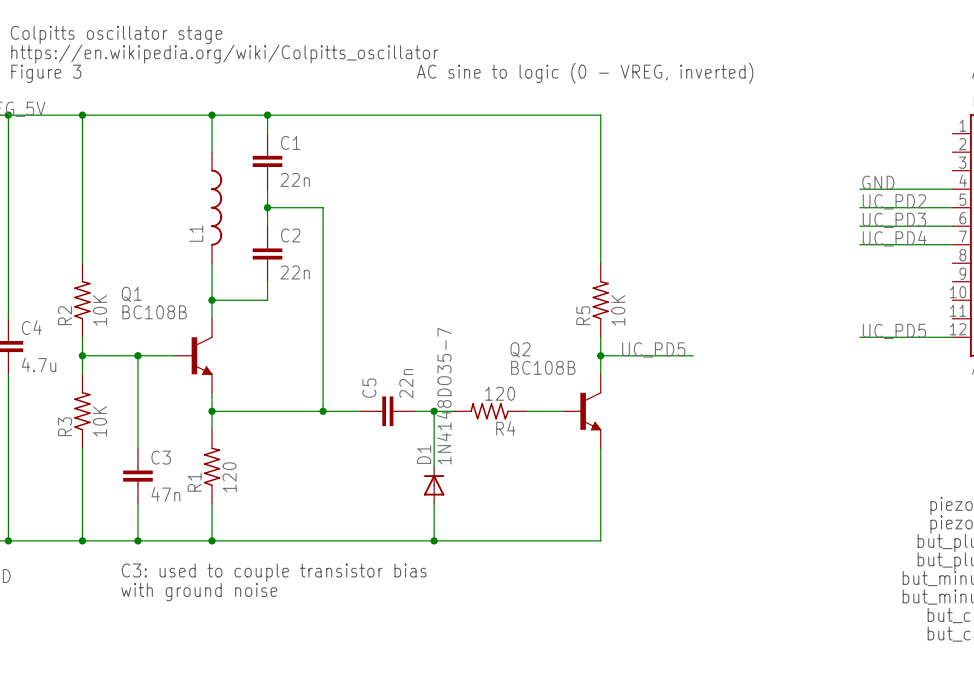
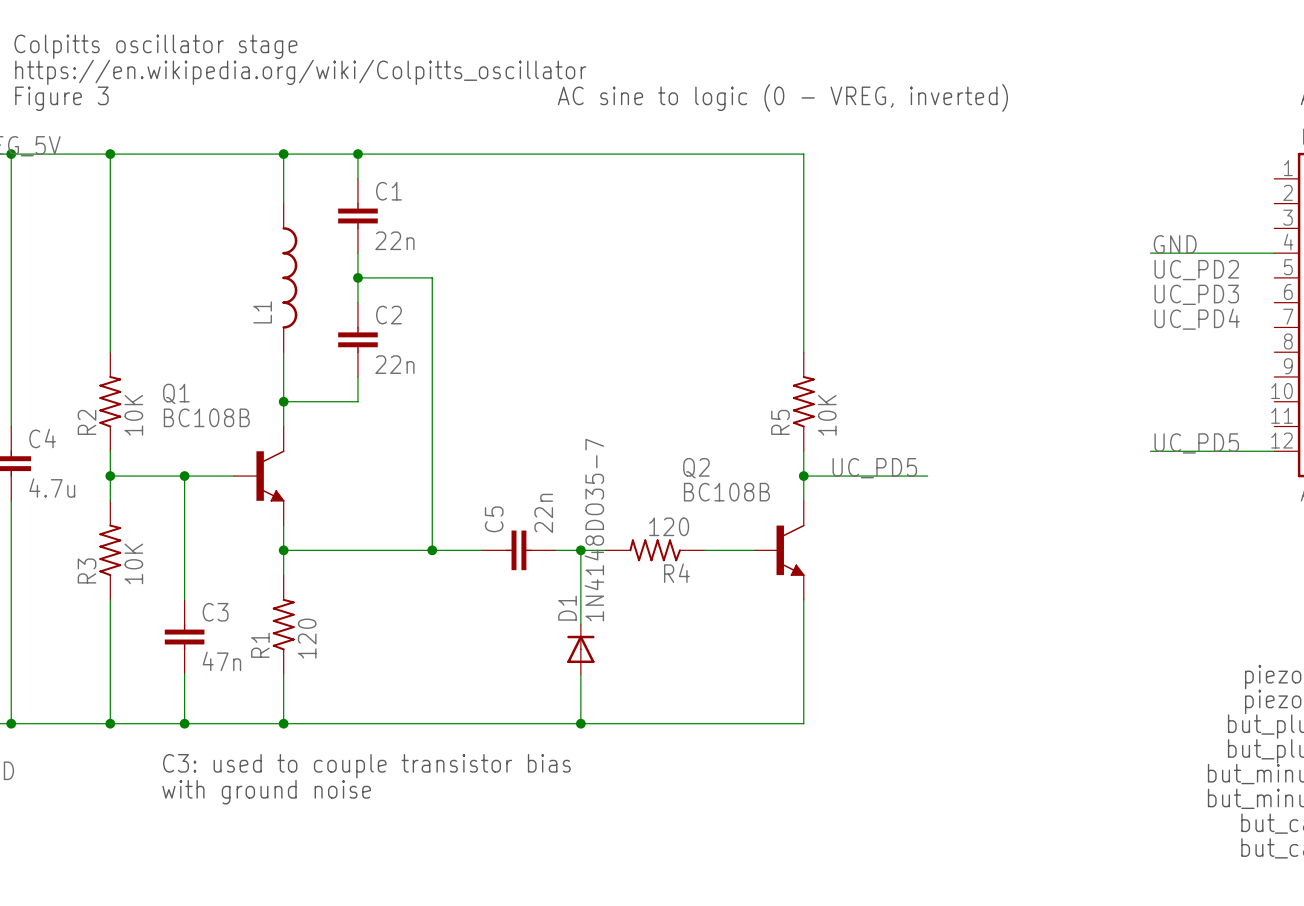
wire: (859, 207) (952, 207) -> none
wire: (859, 226) (952, 226) -> none
wire: (859, 244) (952, 244) -> none

